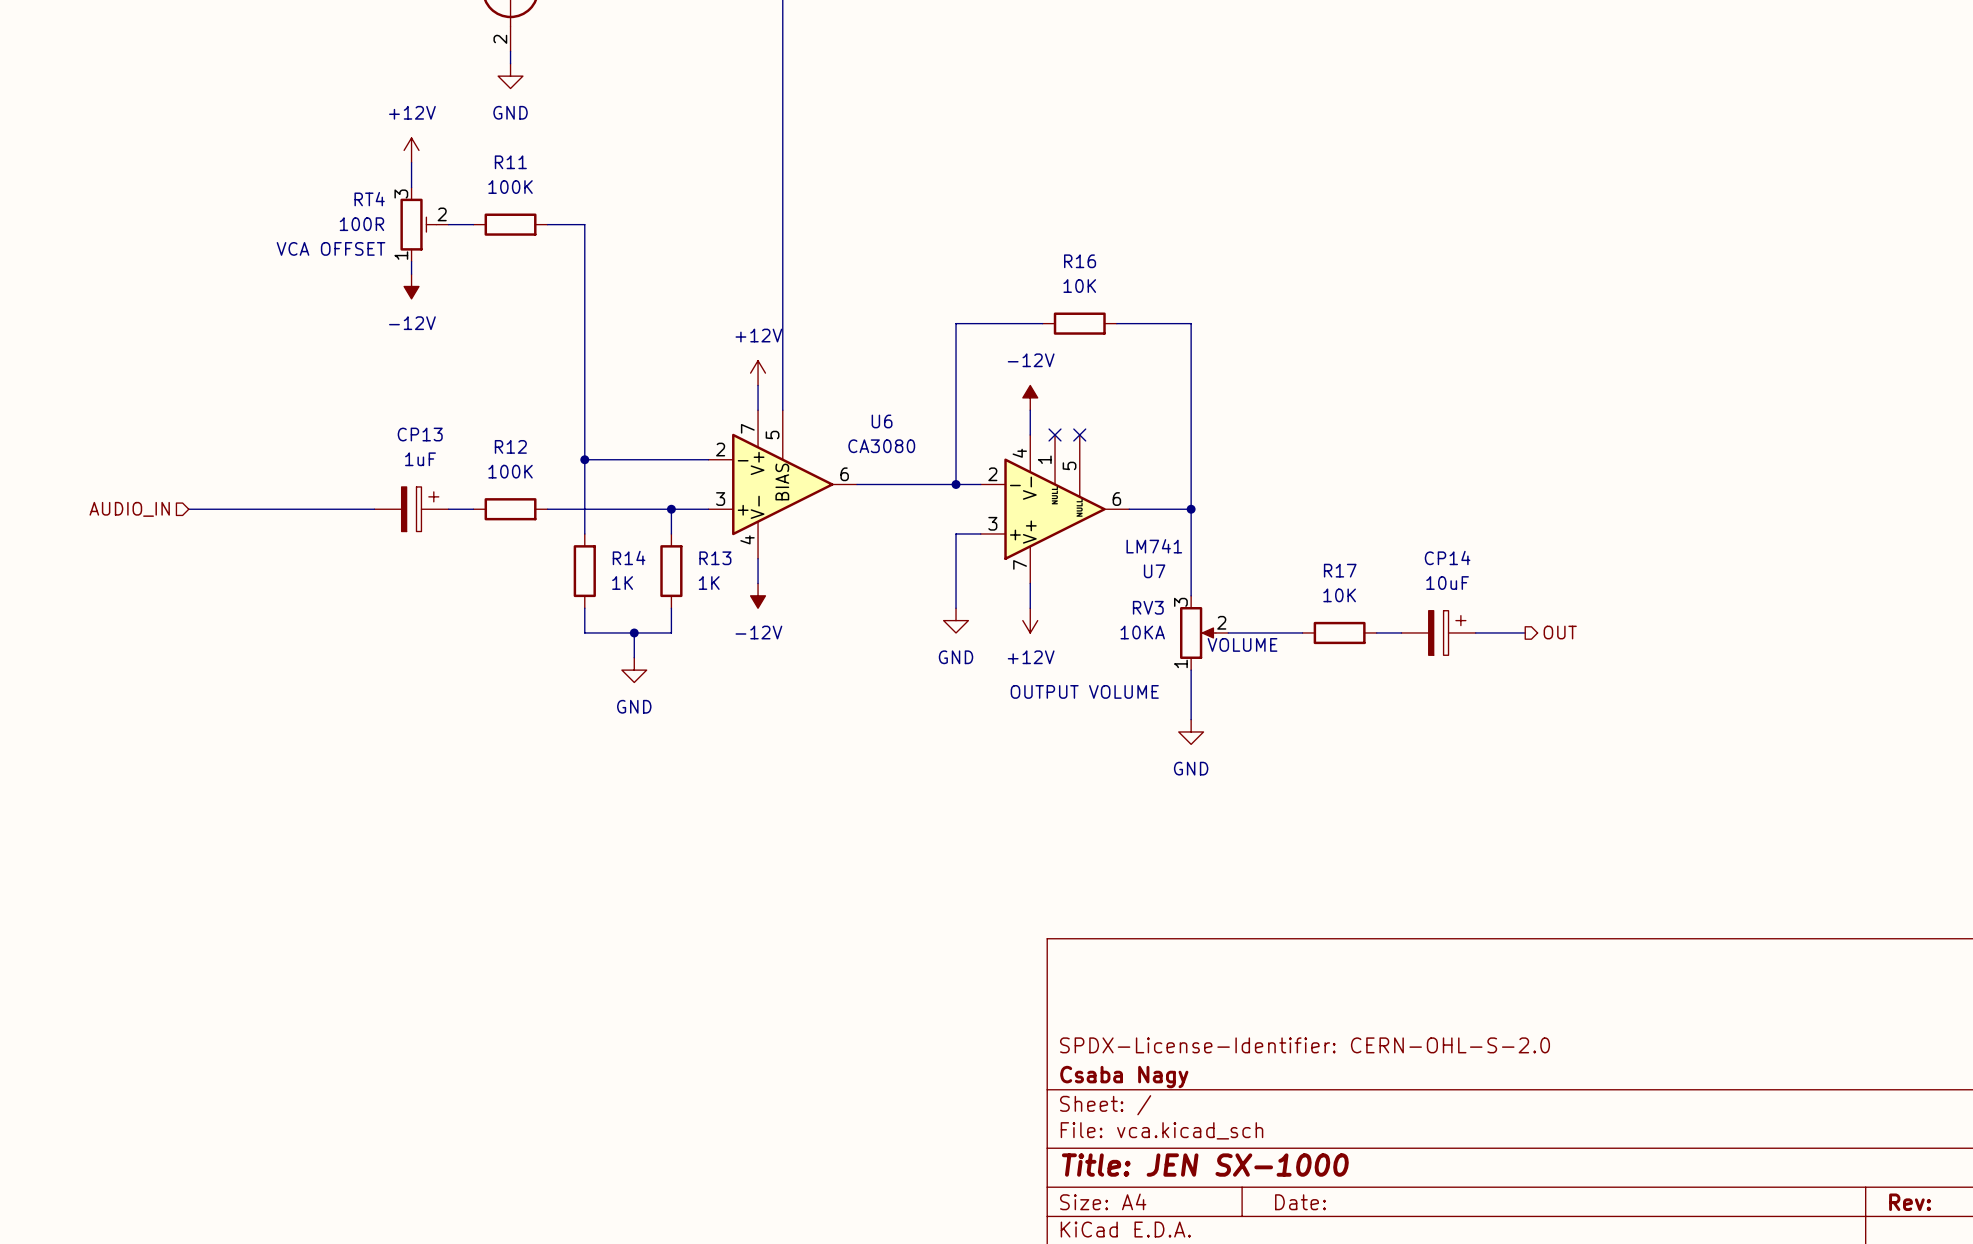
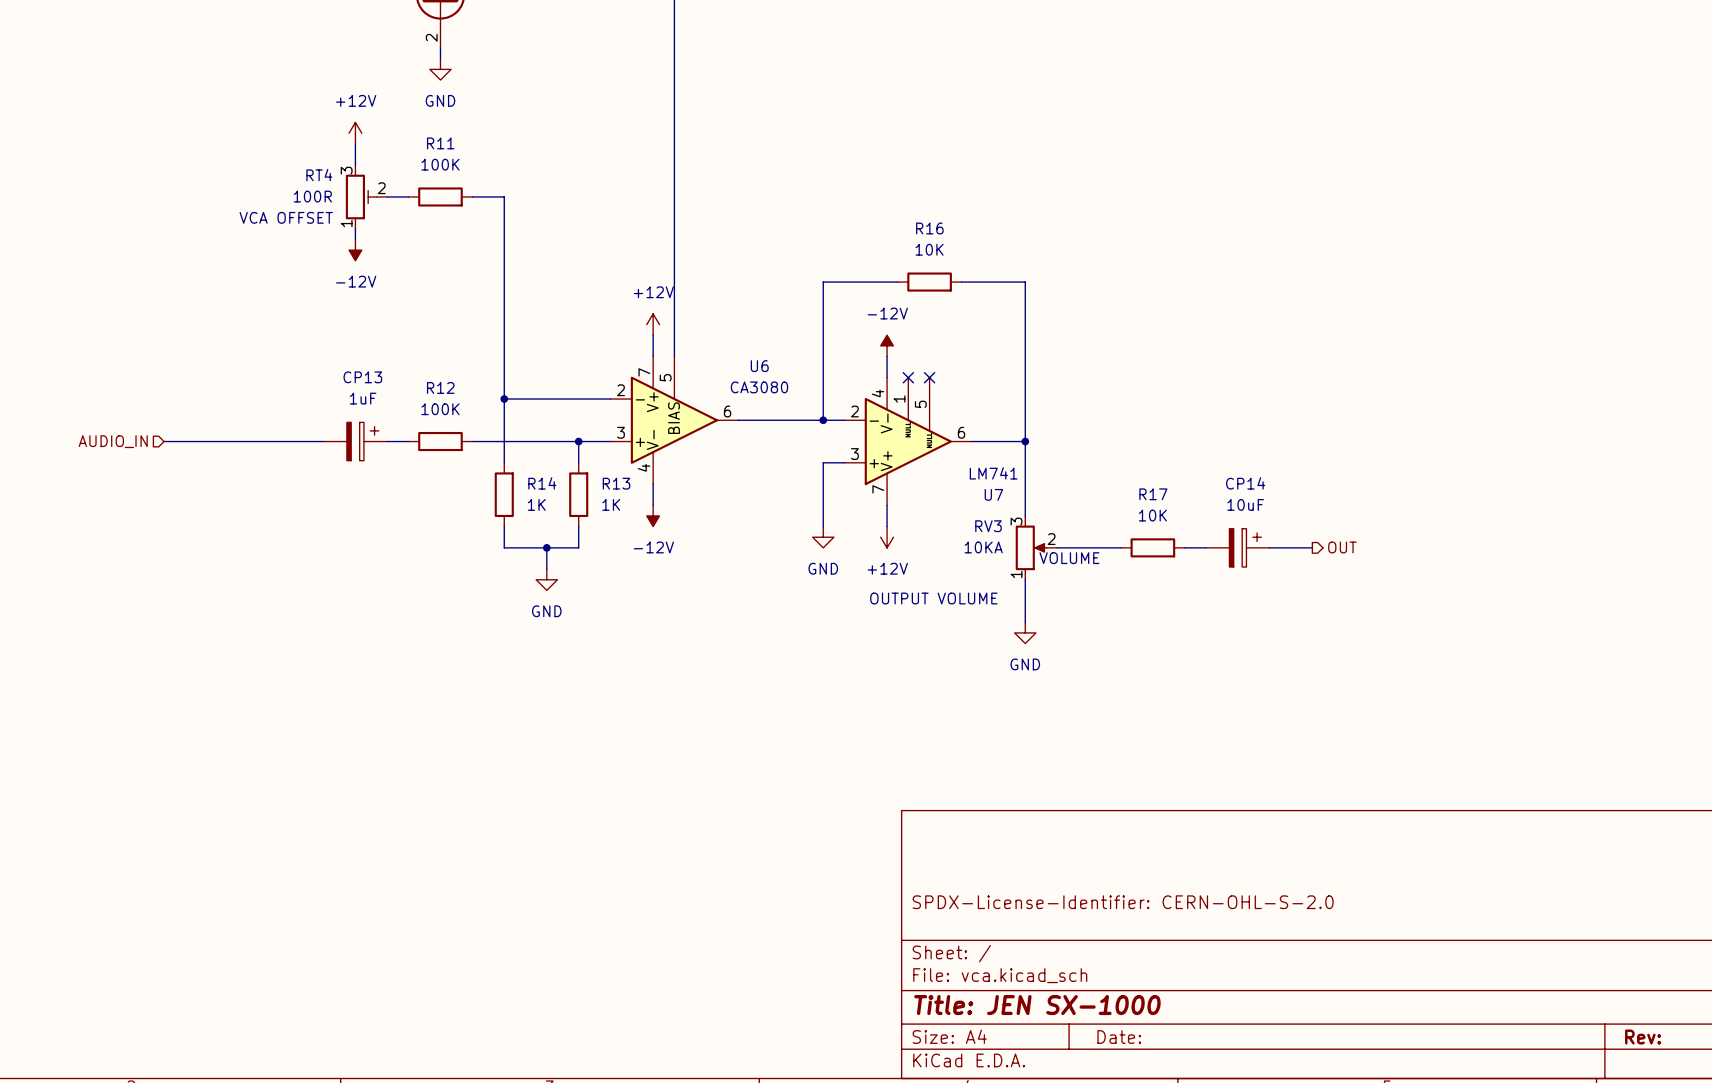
title block: Csaba Nagy (1124, 1077) -> none

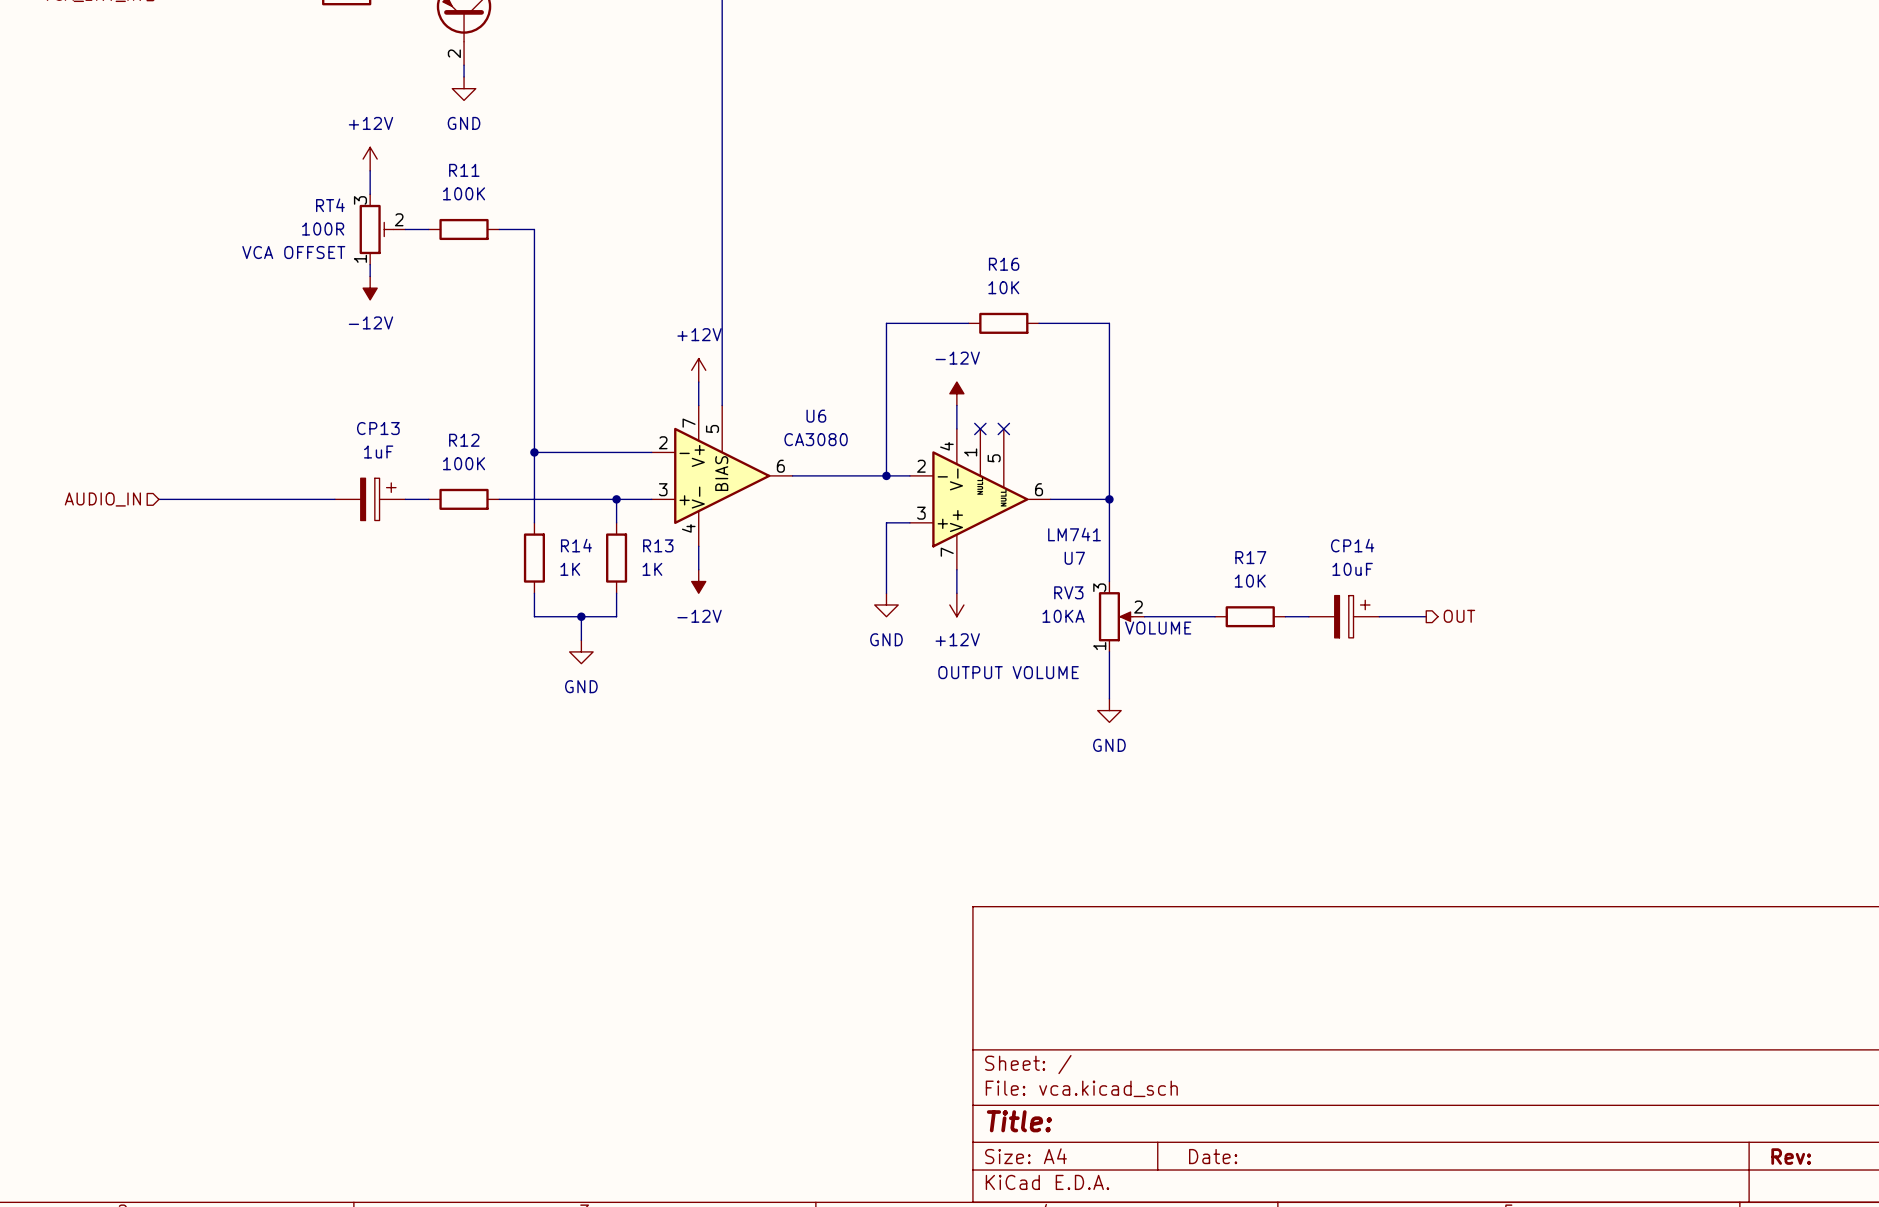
title block: SPDX-License-Identifier: CERN-OHL-S-2.0 (1123, 902) -> none
title block: Title: JEN SX-1000 (1037, 1005) -> Title: (1019, 1121)

